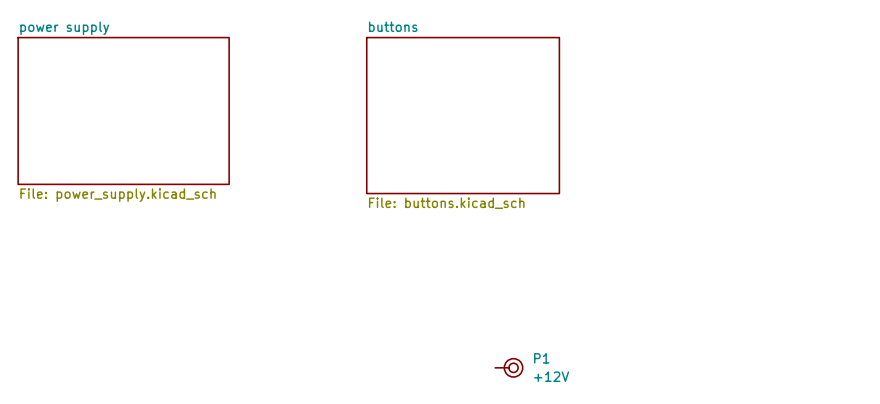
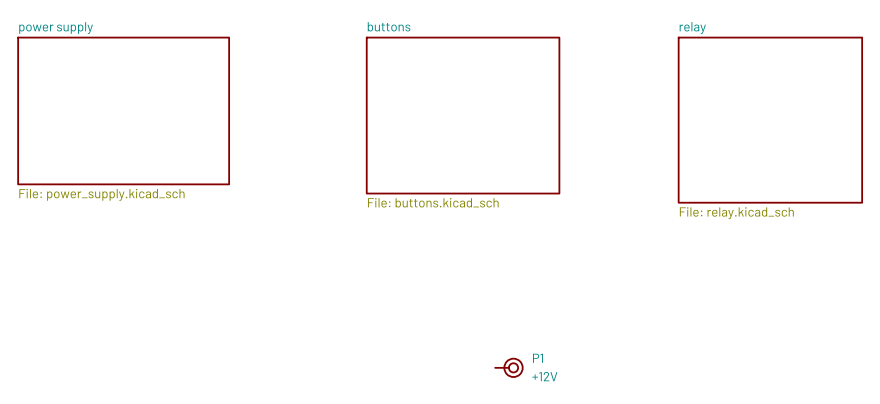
sheet relay: none -> File: relay.kicad_sch (770, 120)

